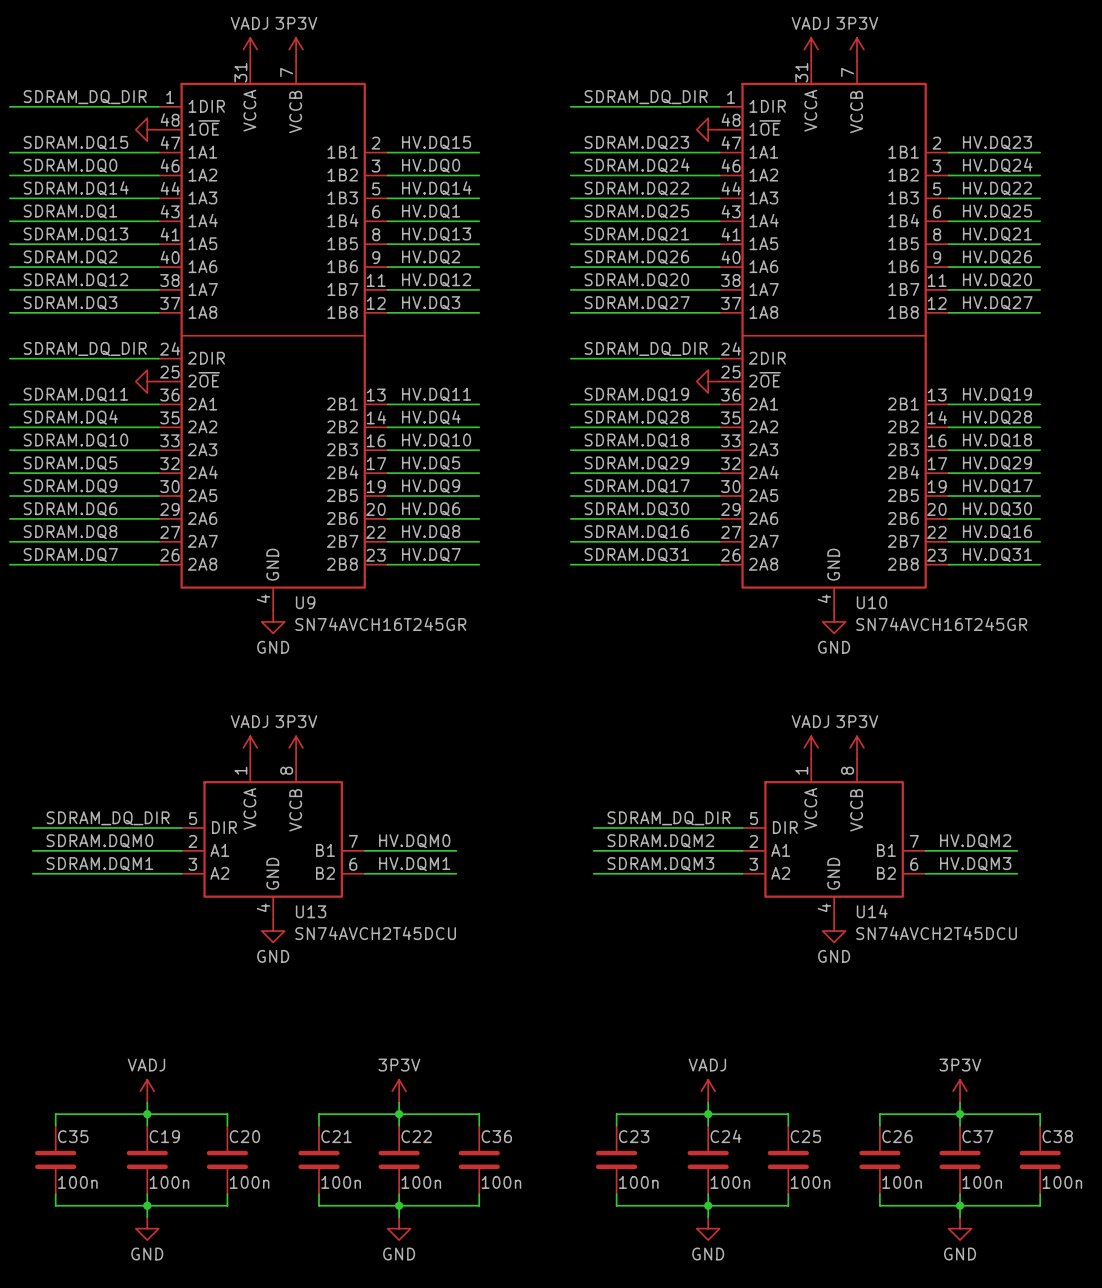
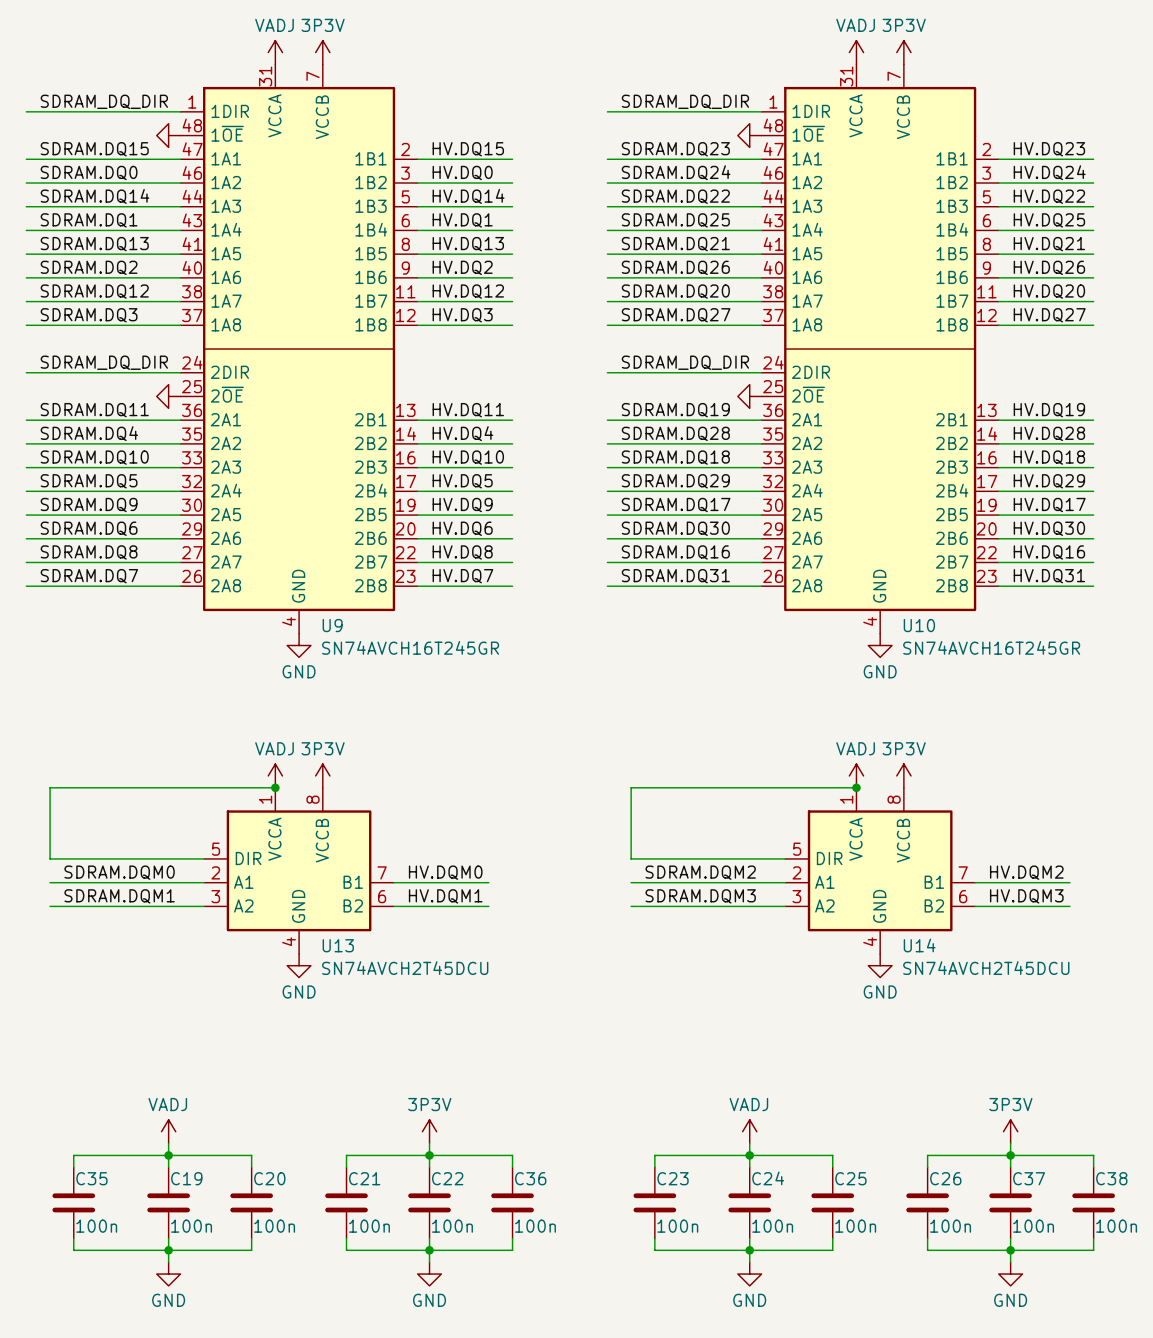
wire: none -> (275, 787) (50, 787) (50, 858)
junction: none -> (275, 787)
wire: none -> (856, 787) (631, 787) (631, 858)
junction: none -> (856, 787)
label: SDRAM_DQ_DIR (108, 818) -> none
label: SDRAM_DQ_DIR (669, 818) -> none

